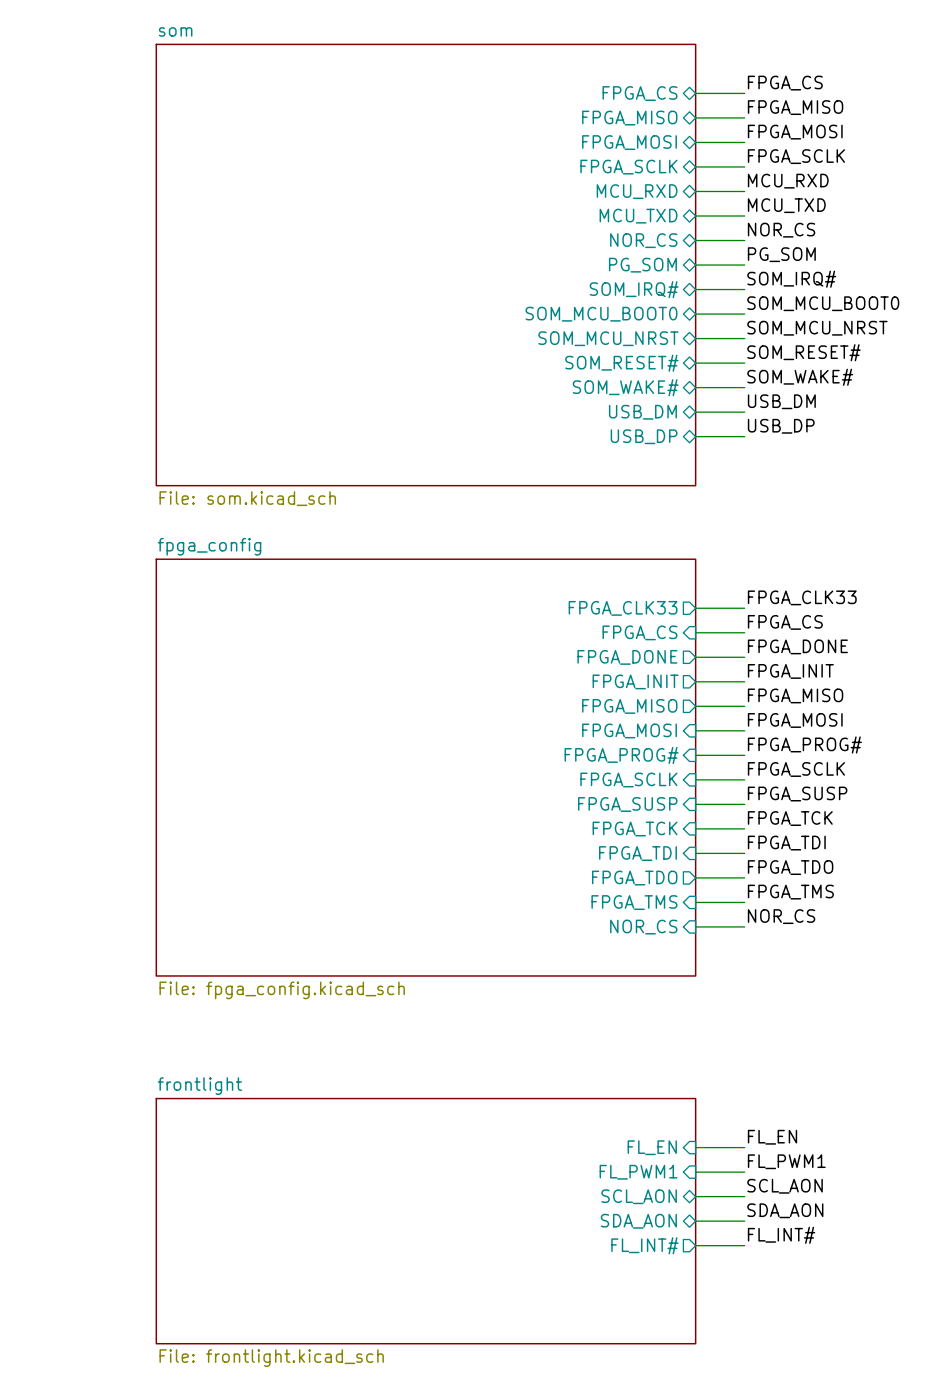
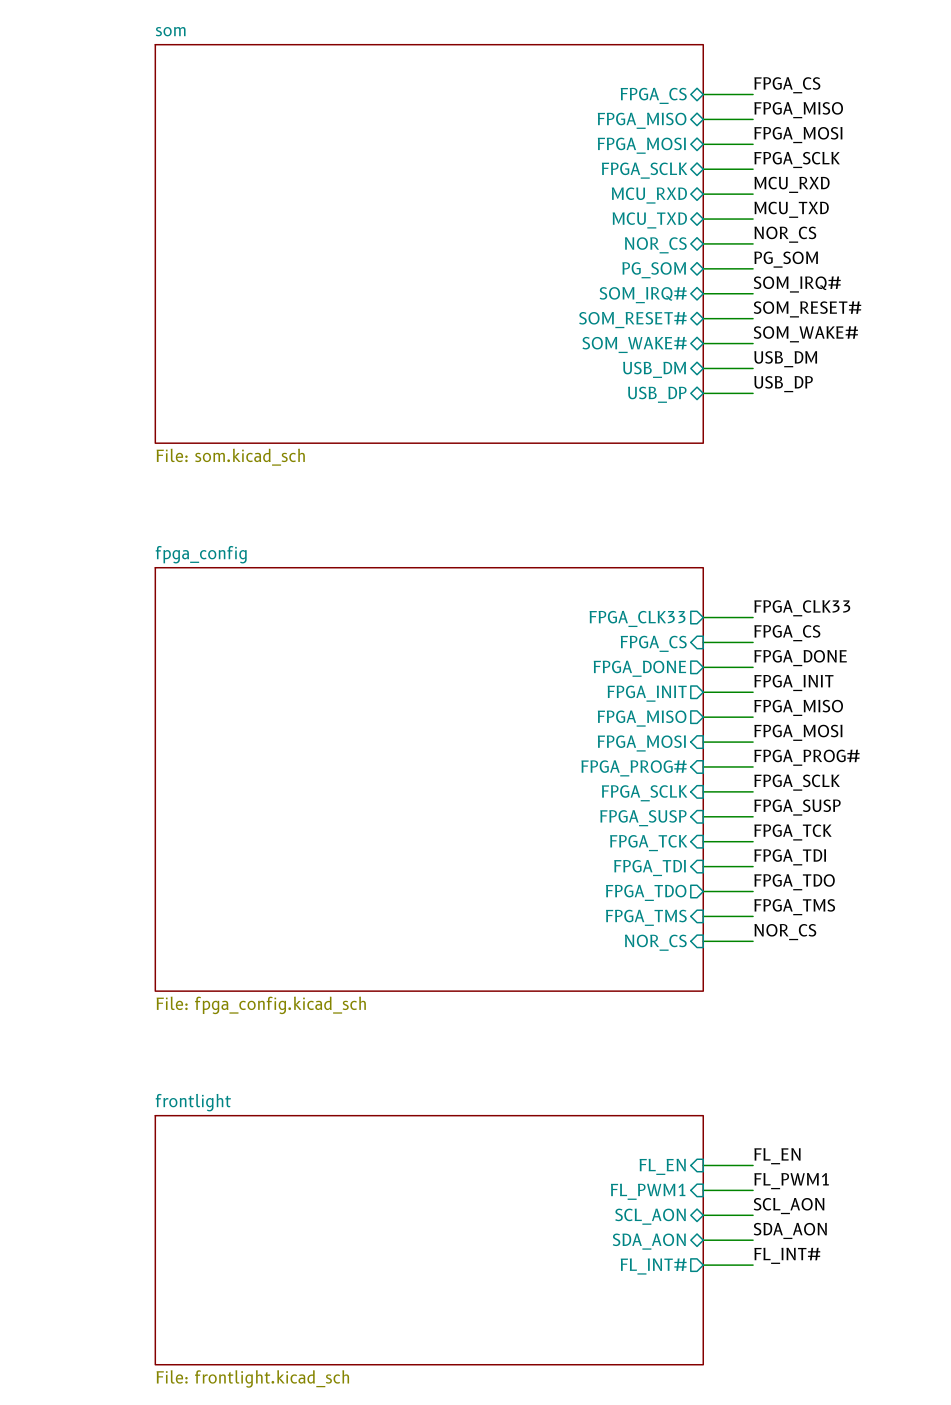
sheet som: none -> File: som.kicad_sch (429, 243)
sheet som: File: som.kicad_sch (425, 265) -> none
label: SOM_MCU_BOOT0 (823, 303) -> SOM_RESET# (807, 309)
sheet pin: SOM_MCU_BOOT0 (601, 314) -> SOM_RESET# (632, 320)
label: SOM_MCU_NRST (817, 328) -> SOM_WAKE# (805, 334)
sheet pin: SOM_MCU_NRST (608, 338) -> SOM_WAKE# (634, 344)
label: SOM_RESET# (804, 352) -> USB_DM (785, 359)
sheet pin: SOM_RESET# (621, 363) -> USB_DM (654, 369)
label: SOM_WAKE# (800, 377) -> USB_DP (783, 384)
sheet pin: SOM_WAKE# (625, 387) -> USB_DP (657, 394)
label: USB_DM (781, 401) -> none
sheet pin: USB_DM (642, 412) -> none
wire: (695, 412) (744, 412) -> none
label: USB_DP (781, 426) -> none
sheet pin: USB_DP (644, 436) -> none
wire: (695, 436) (744, 436) -> none

